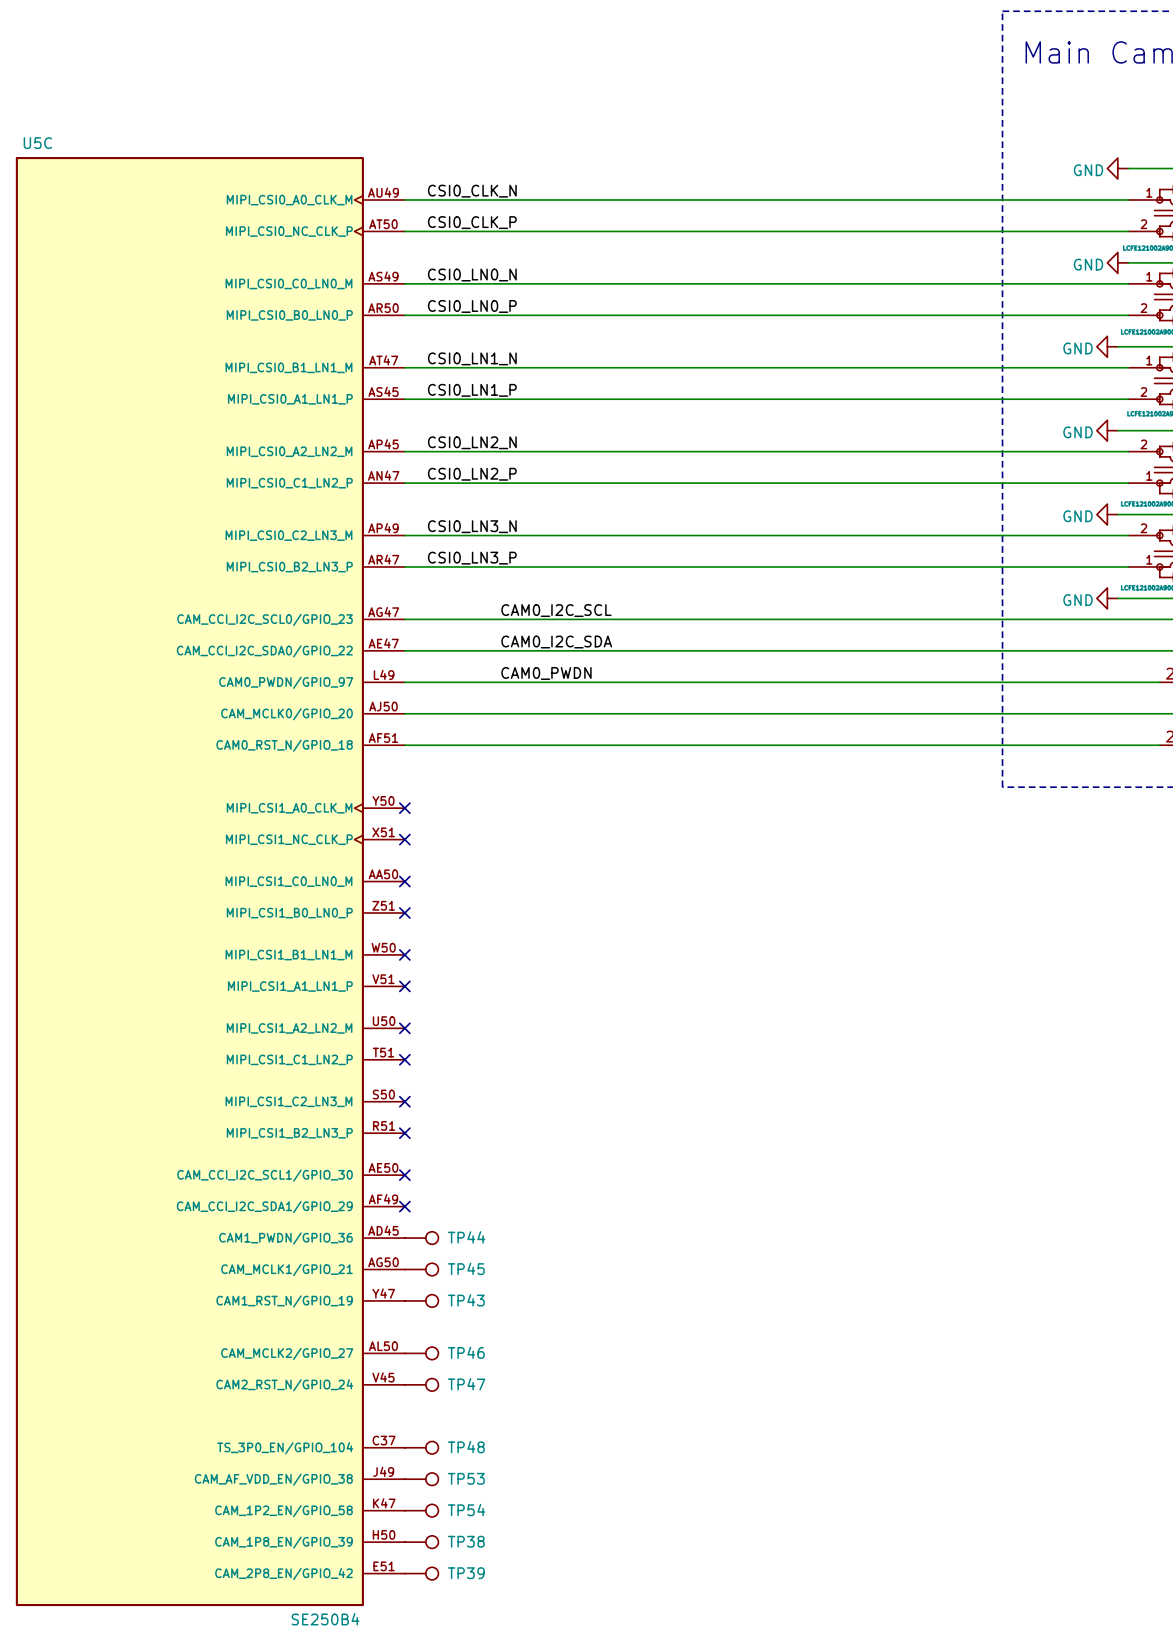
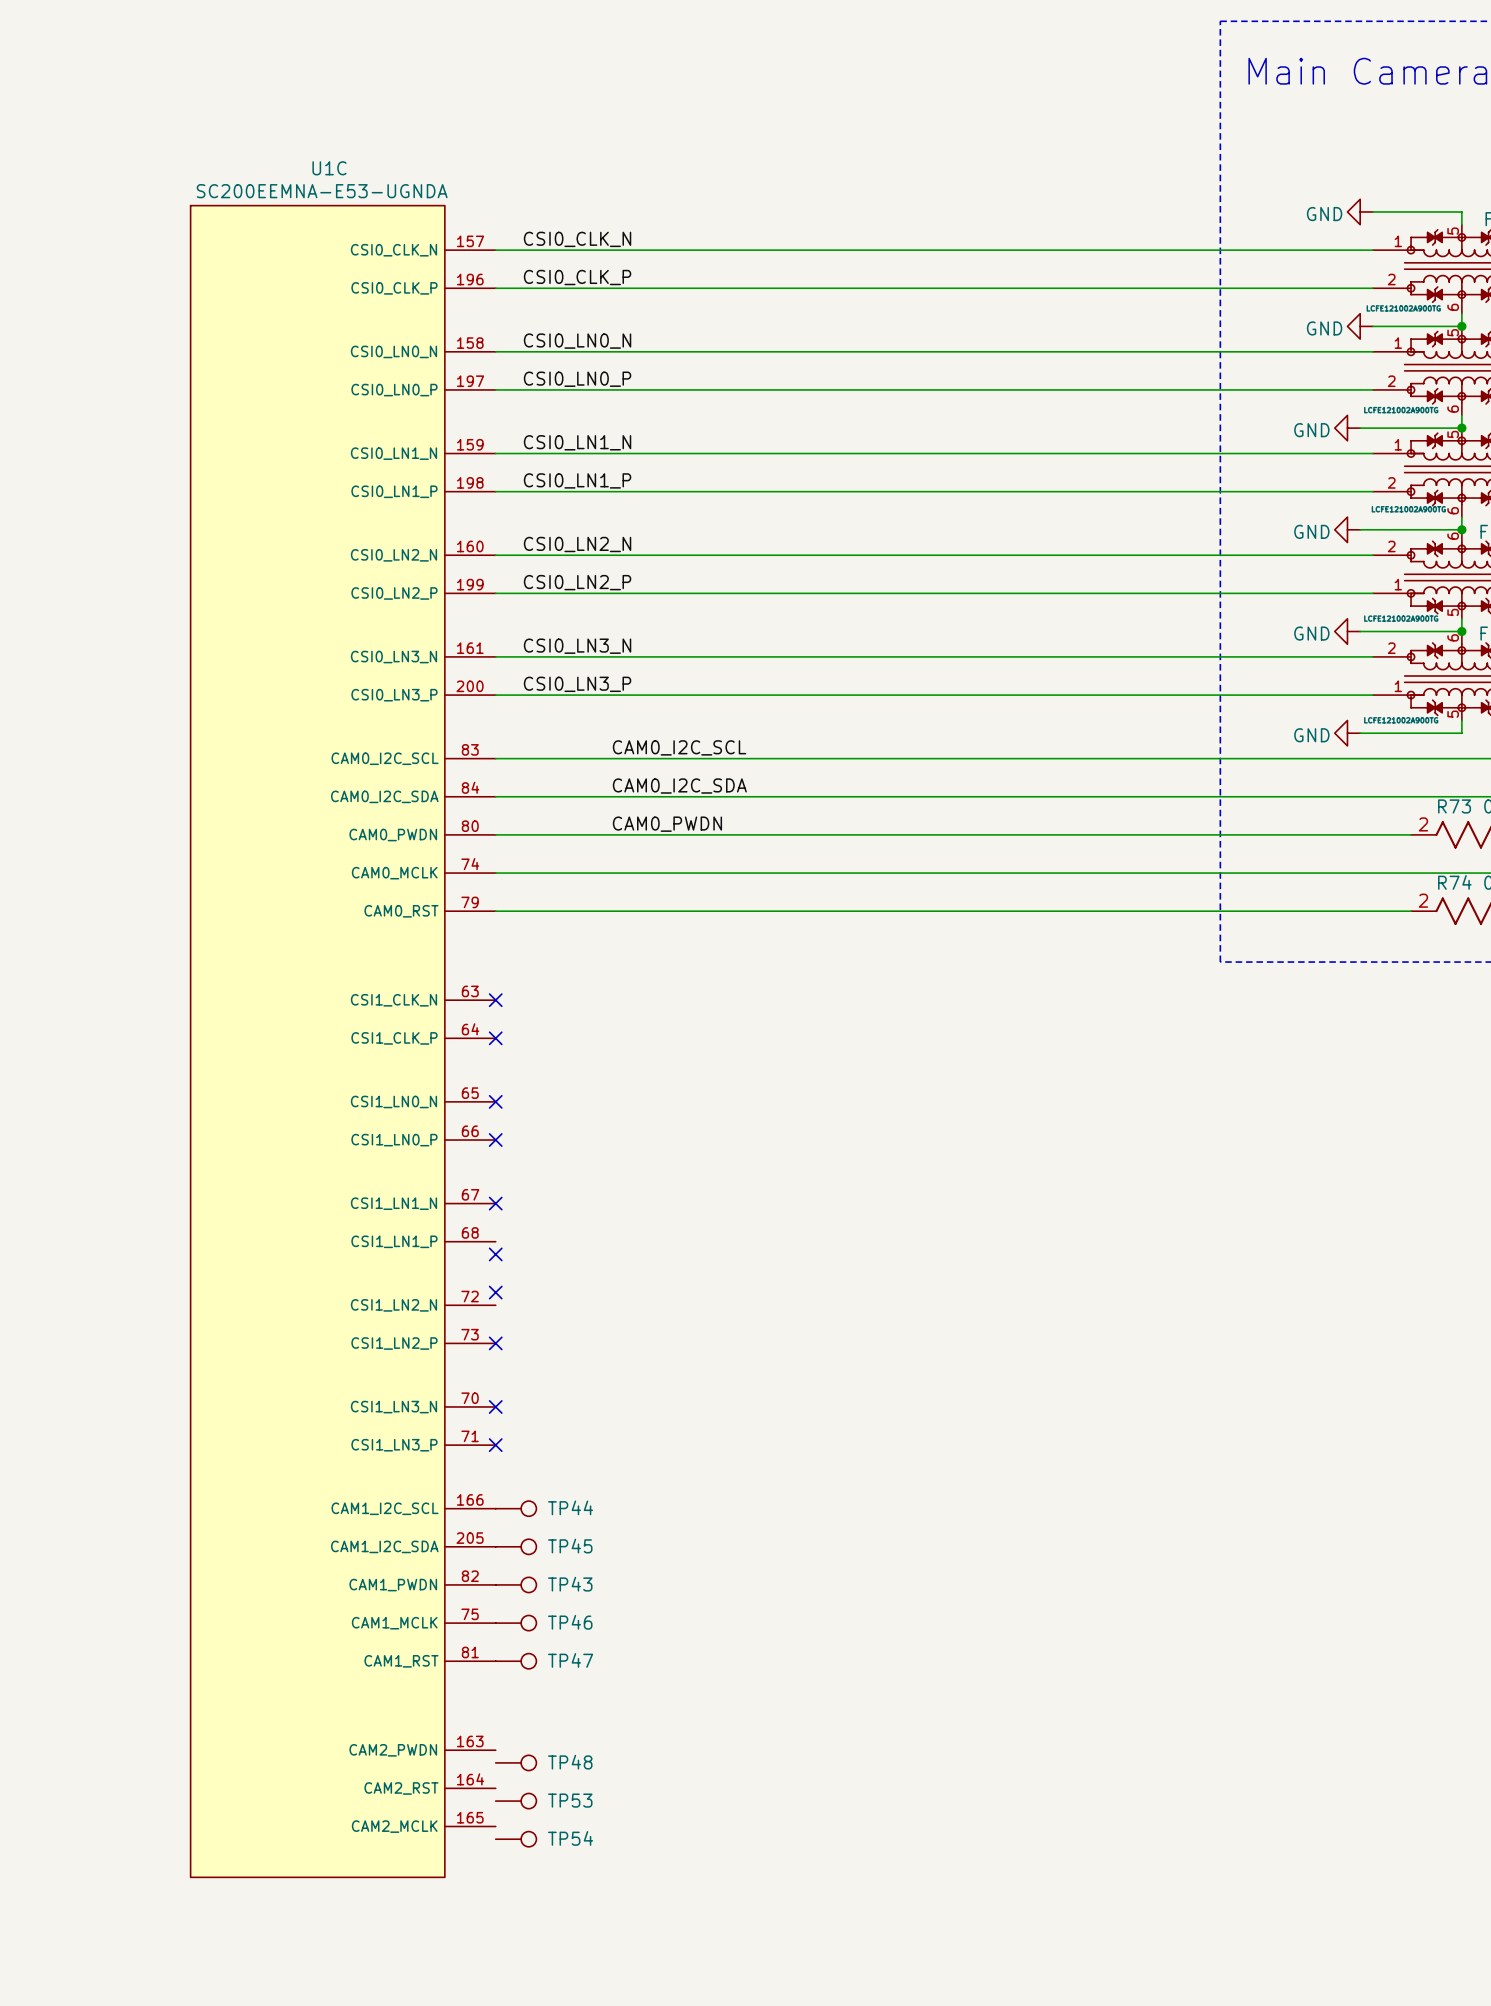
no-connect mark: (404, 808) -> none
no-connect mark: none -> (495, 1000)
no-connect mark: (404, 839) -> none
no-connect mark: none -> (495, 1038)
U1C: none -> SC200EEMNA-E53-UGNDA (343, 1041)
U5C: SE250B4 (210, 881) -> none
no-connect mark: (404, 881) -> none
no-connect mark: none -> (495, 1101)
no-connect mark: (404, 913) -> none
no-connect mark: none -> (495, 1140)
no-connect mark: (404, 954) -> none
no-connect mark: (404, 1133) -> none
no-connect mark: none -> (495, 1406)
no-connect mark: (404, 1175) -> none
no-connect mark: none -> (495, 1445)
no-connect mark: (404, 1206) -> none
TP46 position: (421, 1353) -> (516, 1623)
TP47 position: (421, 1384) -> (516, 1661)
TP38: (421, 1542) -> none
TP39: (421, 1573) -> none

